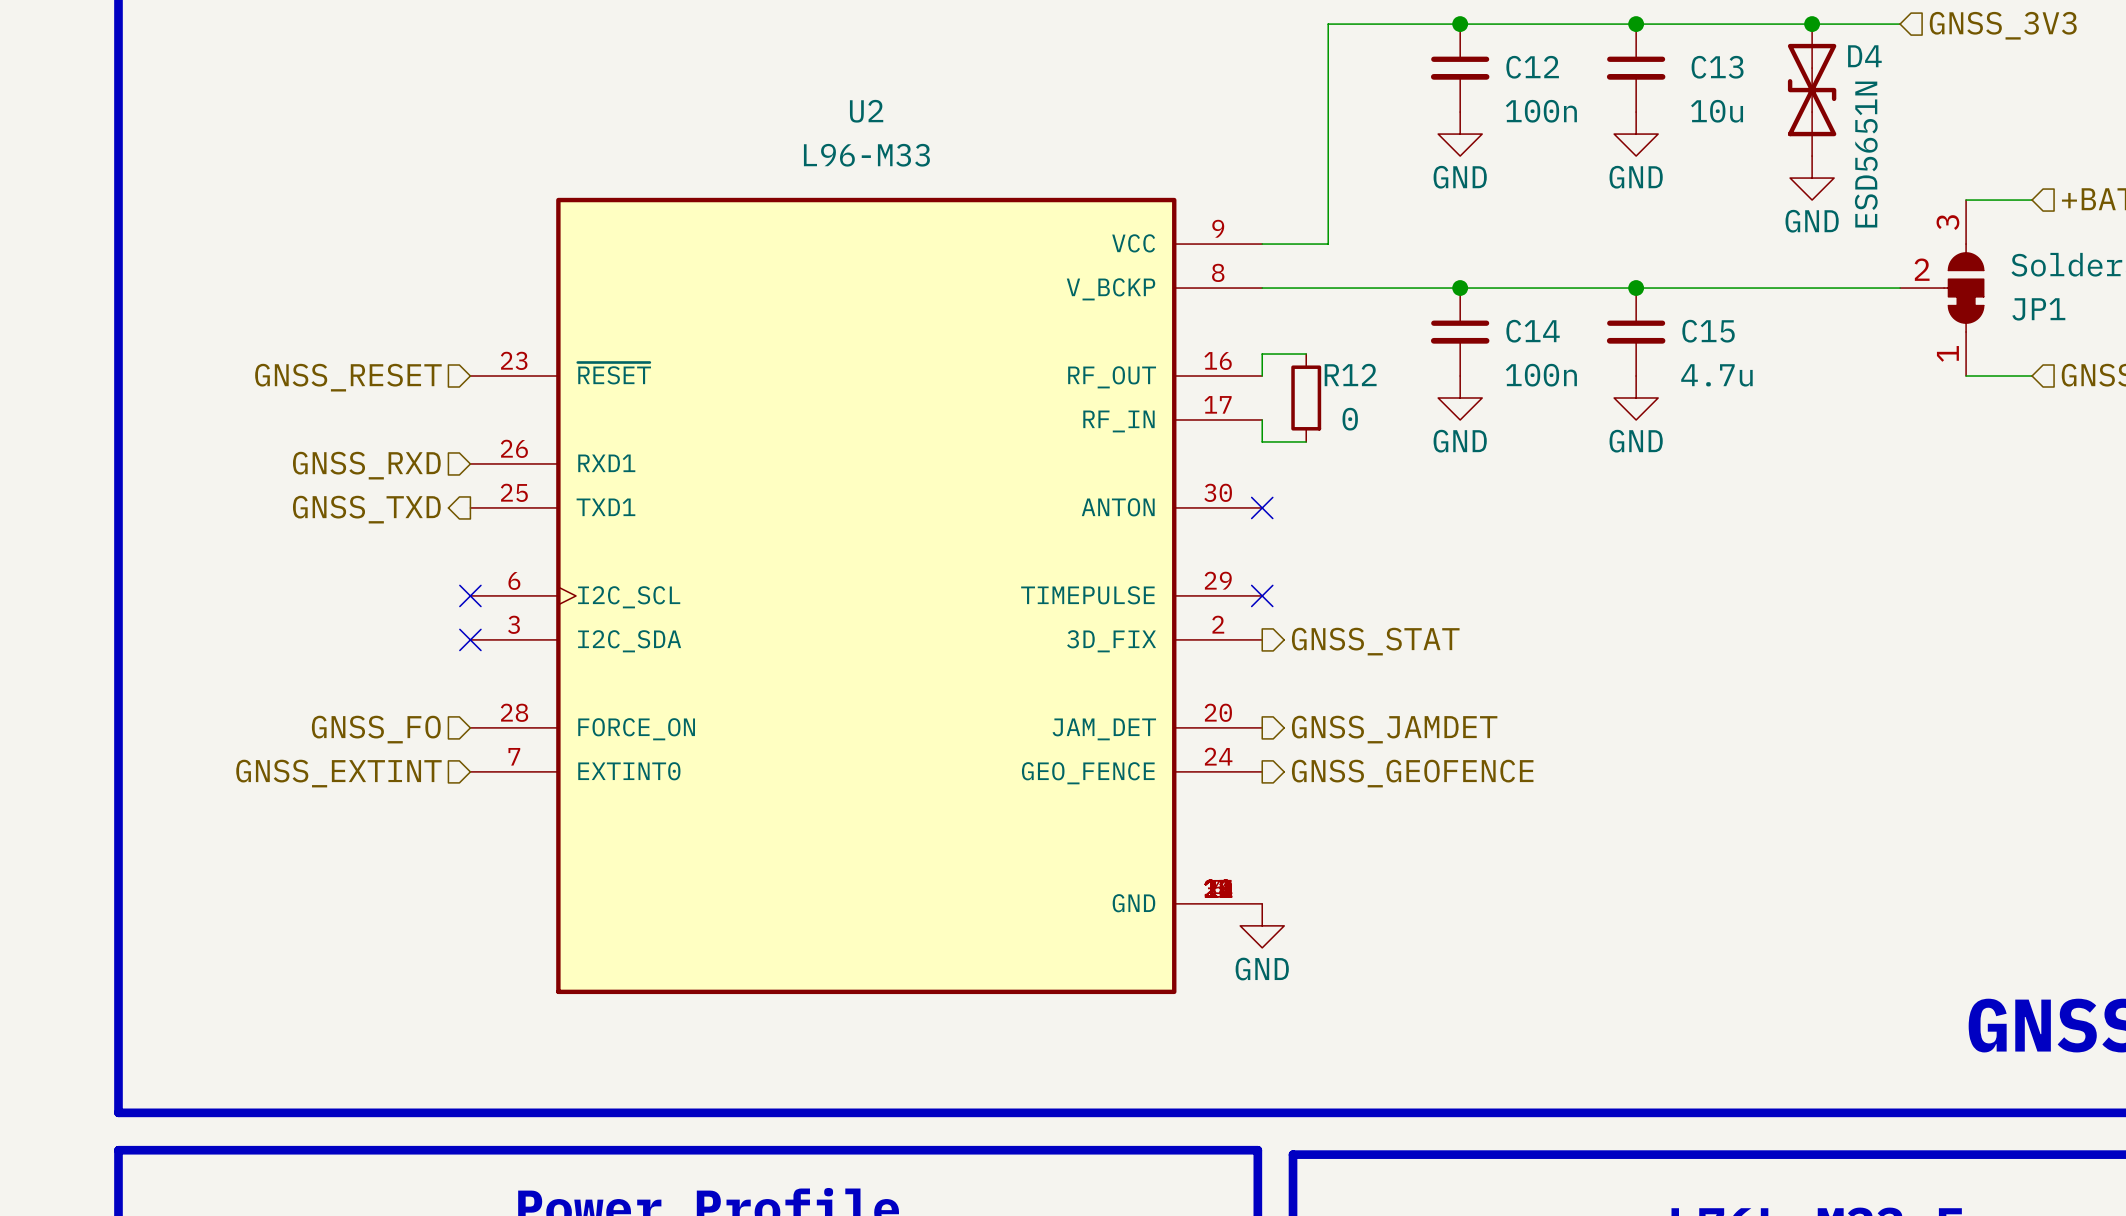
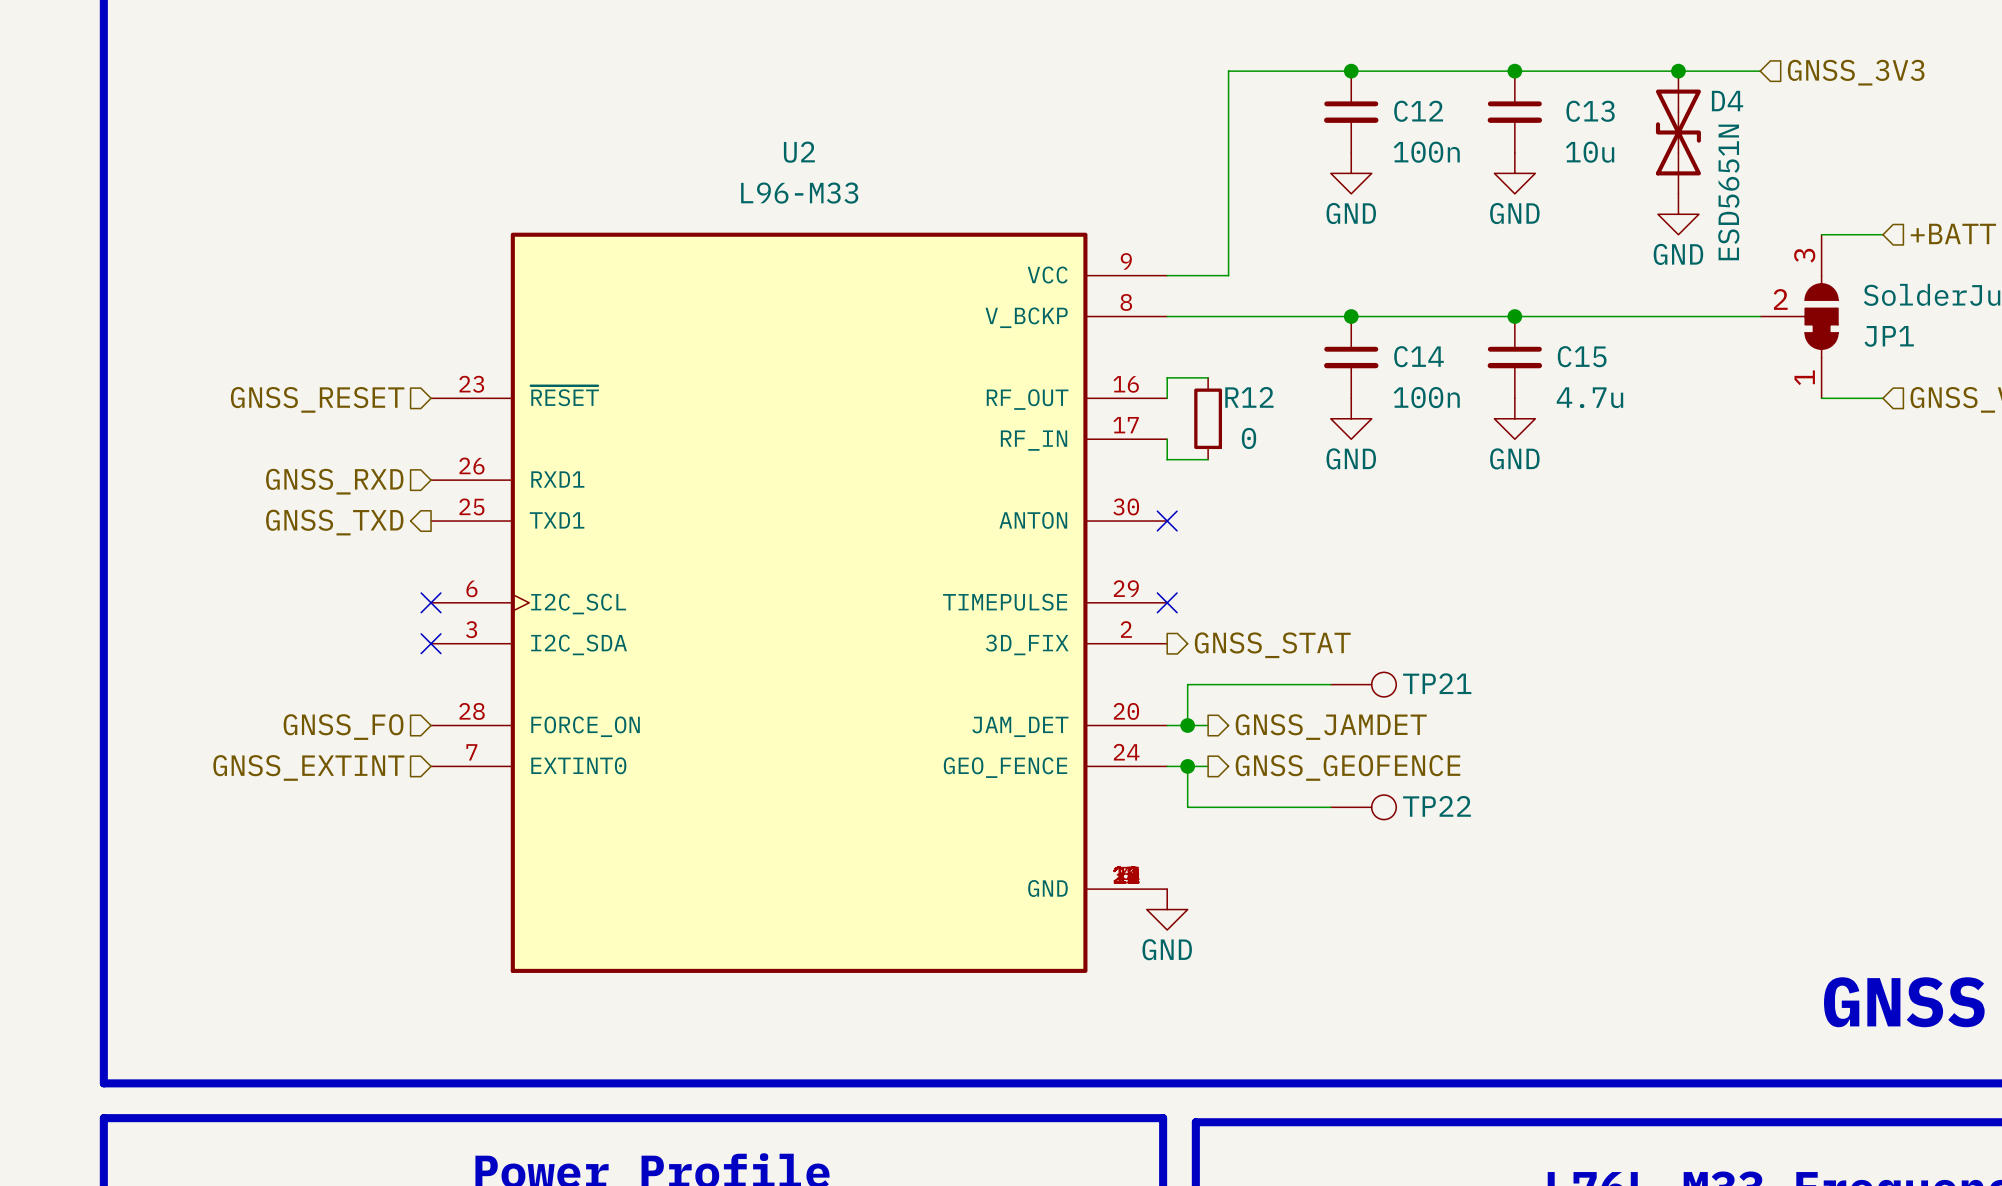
wire: none -> (1330, 684) (1187, 684) (1187, 725)
TP21: none -> (1363, 684)
wire: none -> (1167, 725) (1208, 725)
junction: none -> (1187, 725)
hierarchical label position: GNSS_JAMDET (1394, 729) -> GNSS_JAMDET (1331, 727)
wire: none -> (1167, 766) (1208, 766)
wire: none -> (1187, 766) (1187, 807) (1330, 807)
junction: none -> (1187, 766)
hierarchical label position: GNSS_GEOFENCE (1412, 773) -> GNSS_GEOFENCE (1347, 767)
TP22: none -> (1363, 807)

